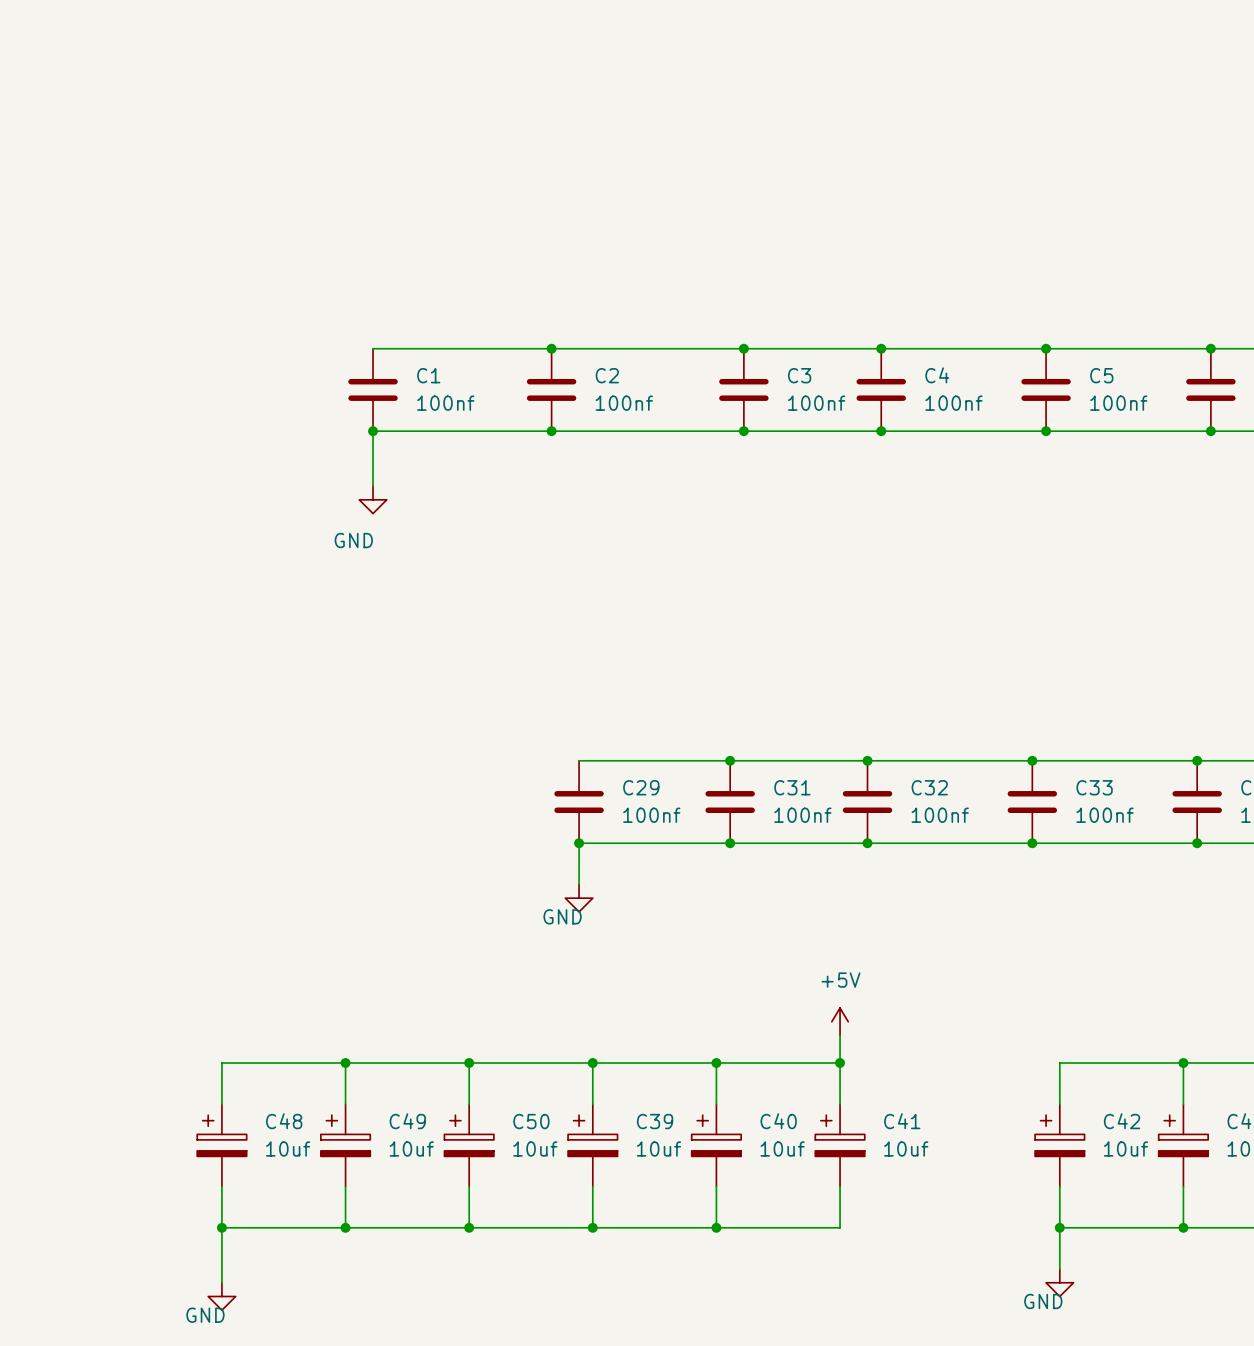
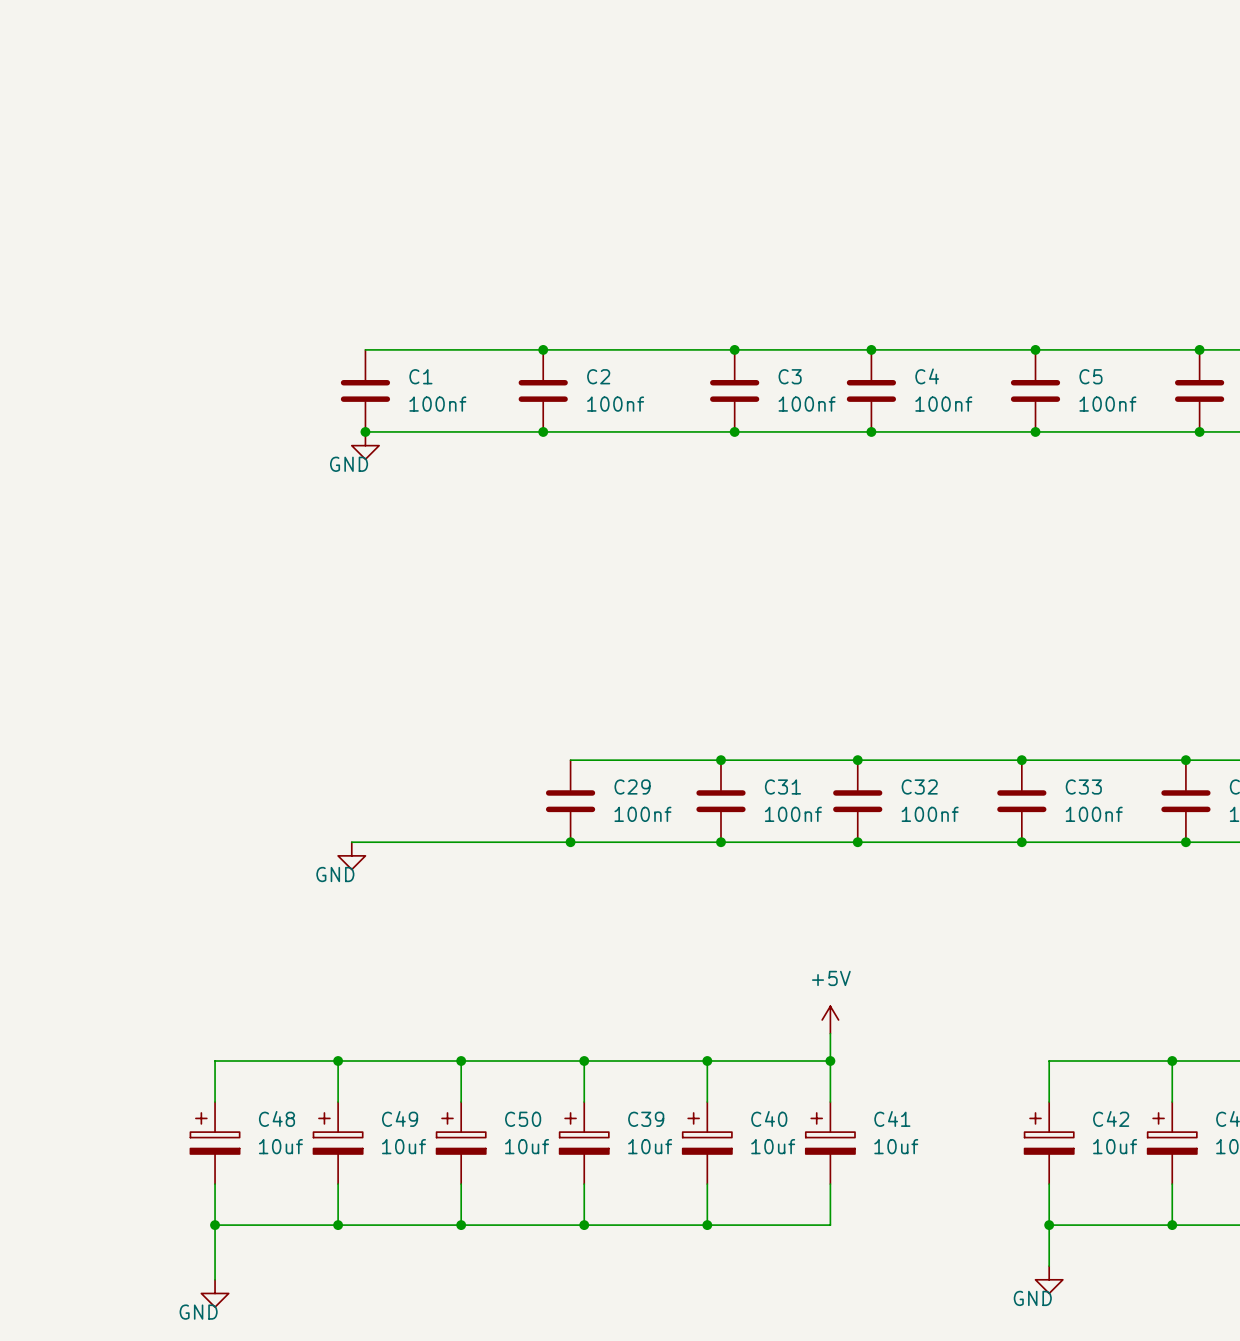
wire: (373, 431) (373, 486) -> none
power symbol position: GND (373, 499) -> GND (365, 445)
power symbol text position: GND (353, 540) -> GND (349, 464)
wire: (579, 843) (579, 884) -> (570, 842) (351, 842)
power symbol: none -> GND (351, 855)
power symbol: GND (579, 898) -> none

